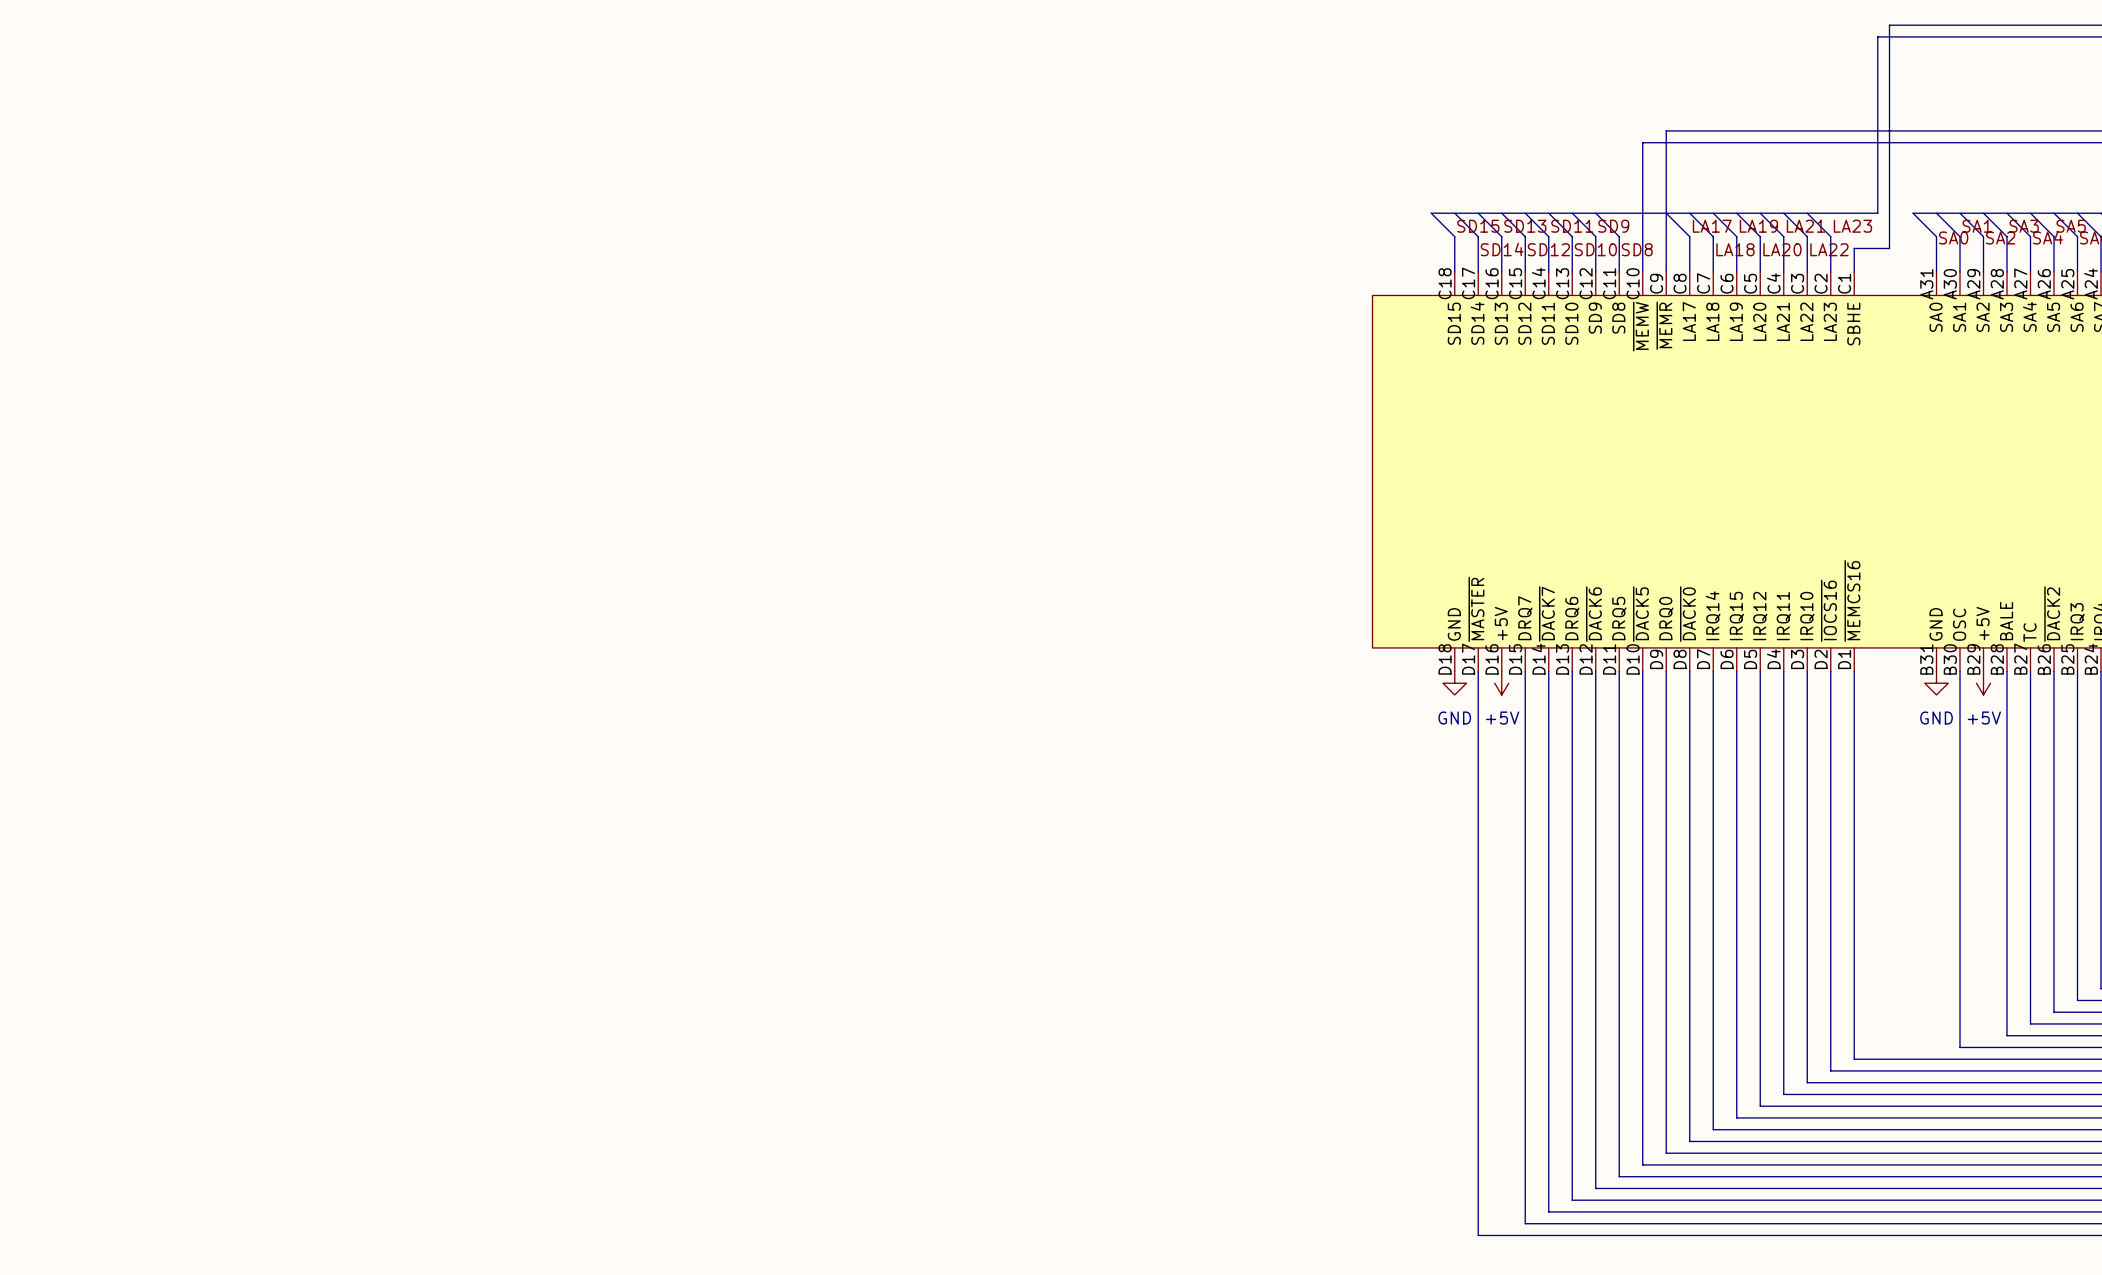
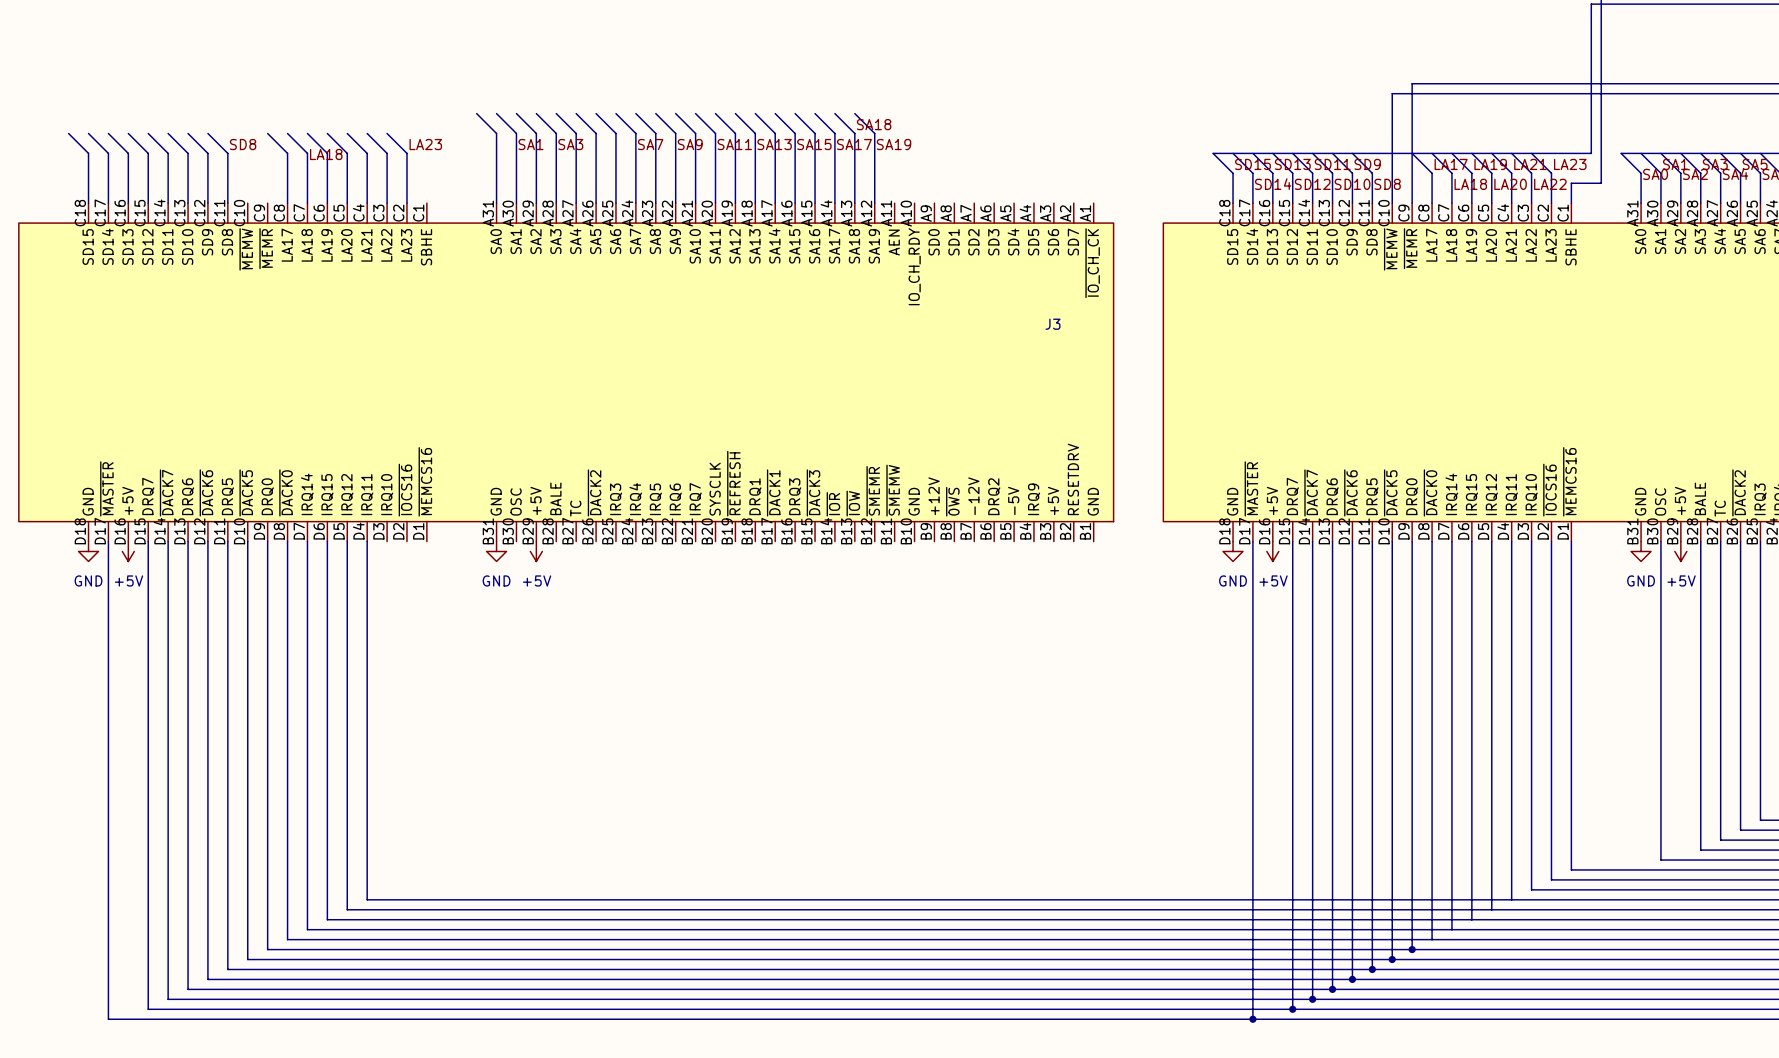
wire: none -> (476, 113) (496, 133) (496, 203)
wire: none -> (496, 113) (516, 133) (516, 203)
wire: none -> (516, 113) (536, 133) (536, 203)
wire: none -> (536, 113) (556, 133) (556, 203)
wire: none -> (556, 113) (576, 133) (576, 203)
wire: none -> (576, 113) (596, 133) (596, 203)
wire: none -> (596, 113) (615, 133) (615, 203)
wire: none -> (615, 113) (635, 133) (635, 203)
wire: none -> (635, 113) (655, 133) (655, 203)
wire: none -> (655, 113) (675, 133) (675, 203)
wire: none -> (675, 113) (695, 133) (695, 203)
wire: none -> (695, 113) (715, 133) (715, 203)
wire: none -> (715, 113) (735, 133) (735, 203)
wire: none -> (735, 113) (755, 133) (755, 203)
wire: none -> (755, 113) (775, 133) (775, 203)
wire: none -> (775, 113) (795, 133) (795, 203)
wire: none -> (795, 113) (815, 133) (815, 203)
wire: none -> (815, 113) (834, 133) (834, 203)
wire: none -> (834, 113) (854, 133) (854, 203)
wire: none -> (854, 113) (874, 133) (874, 203)
label: none -> SA18 (874, 124)
wire: none -> (68, 133) (88, 153) (88, 203)
wire: none -> (88, 133) (108, 153) (108, 203)
wire: none -> (108, 133) (128, 153) (128, 203)
wire: none -> (128, 133) (148, 153) (148, 203)
wire: none -> (148, 133) (168, 153) (168, 203)
wire: none -> (168, 133) (188, 153) (188, 203)
wire: none -> (188, 133) (207, 153) (207, 203)
wire: none -> (207, 133) (227, 153) (227, 203)
wire: none -> (267, 133) (287, 153) (287, 203)
wire: none -> (287, 133) (307, 153) (307, 203)
wire: none -> (307, 133) (327, 153) (327, 203)
wire: none -> (327, 133) (347, 153) (347, 203)
wire: none -> (347, 133) (367, 153) (367, 203)
wire: none -> (367, 133) (387, 153) (387, 203)
wire: none -> (387, 133) (406, 153) (406, 203)
label: none -> SD8 (243, 144)
label: none -> LA23 (425, 144)
label: none -> SA1 (530, 144)
label: none -> SA3 (570, 144)
label: none -> SA7 (650, 144)
label: none -> SA9 (690, 144)
label: none -> SA11 (734, 144)
label: none -> SA13 (774, 144)
label: none -> SA15 (814, 144)
label: none -> SA17 (854, 144)
label: none -> SA19 (894, 144)
label: none -> LA18 (326, 154)
J3: none -> (566, 372)
wire: none -> (108, 541) (108, 1019) (1252, 1019)
wire: none -> (148, 541) (148, 1009) (1292, 1009)
wire: none -> (168, 541) (168, 999) (1312, 999)
wire: none -> (188, 541) (188, 989) (1332, 989)
wire: none -> (207, 541) (207, 979) (1352, 979)
wire: none -> (227, 541) (227, 969) (1372, 969)
wire: none -> (247, 541) (247, 959) (1392, 959)
wire: none -> (267, 541) (267, 949) (1412, 949)
wire: none -> (287, 541) (287, 939) (1432, 939)
wire: none -> (307, 541) (307, 929) (1451, 929)
wire: none -> (327, 541) (327, 919) (1471, 919)
wire: none -> (347, 541) (347, 909) (1491, 909)
wire: none -> (367, 541) (367, 899) (1511, 899)
power symbol: none -> GND (88, 551)
power symbol: none -> +5V (128, 551)
power symbol: none -> GND (496, 551)
power symbol: none -> +5V (536, 551)
junction: none -> (1412, 949)
junction: none -> (1392, 959)
junction: none -> (1372, 969)
junction: none -> (1352, 979)
junction: none -> (1332, 989)
junction: none -> (1312, 999)
junction: none -> (1292, 1009)
junction: none -> (1252, 1019)

